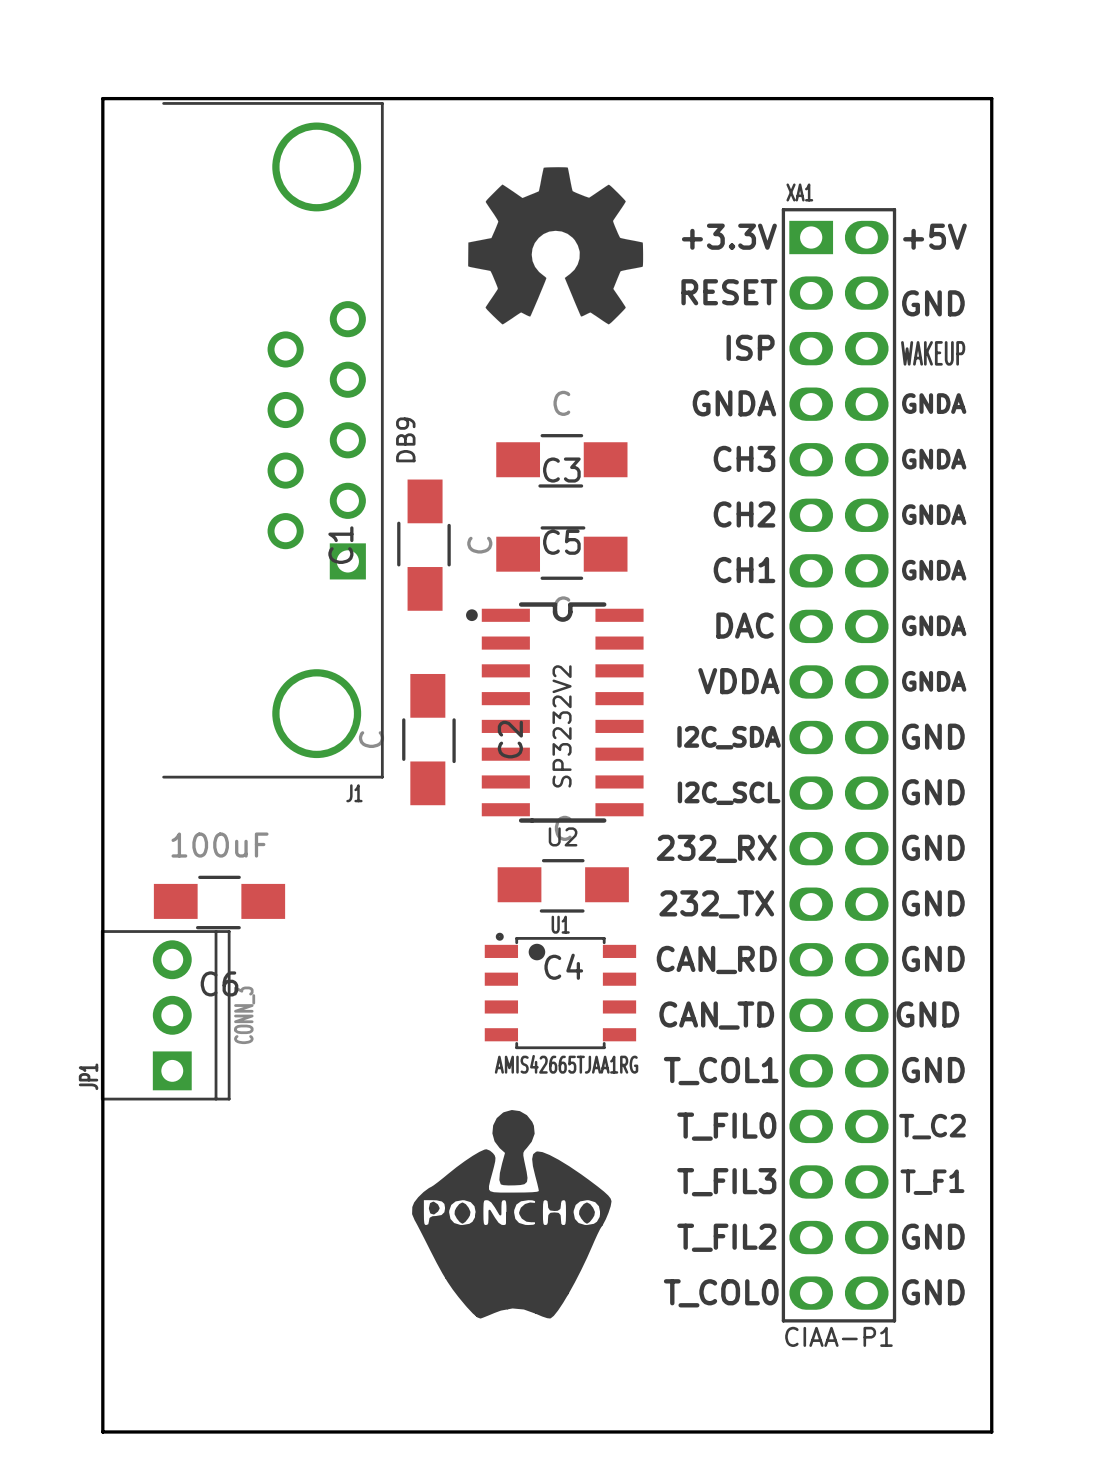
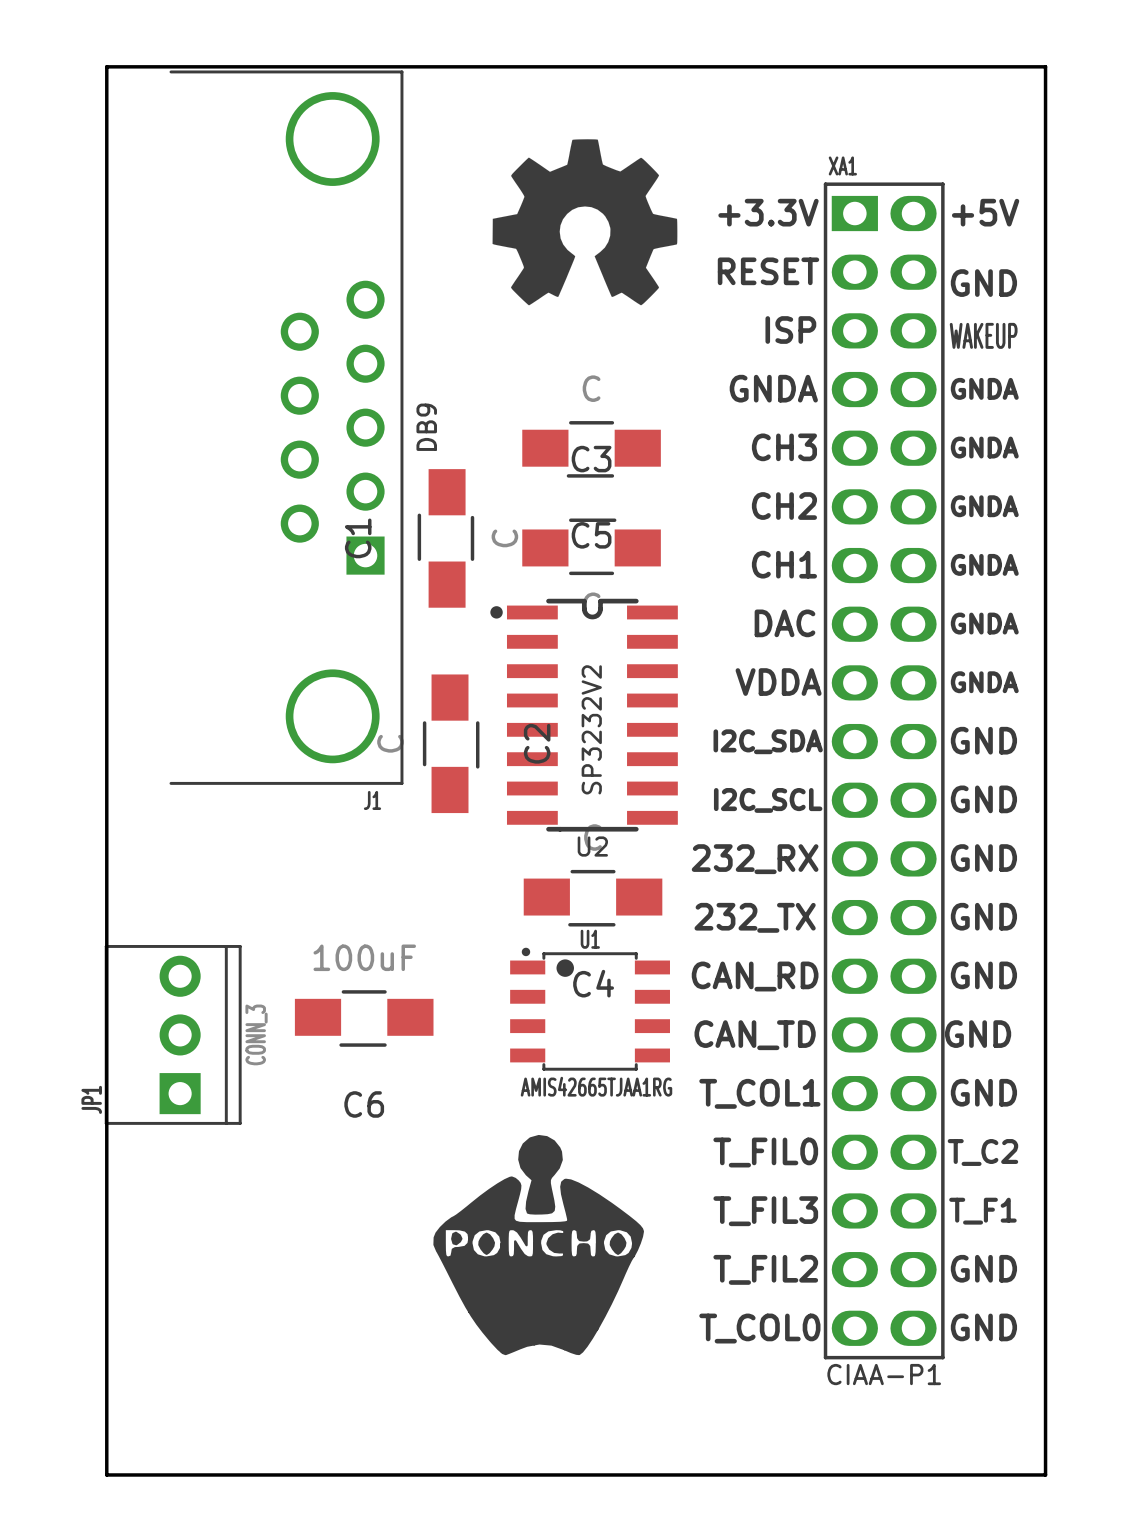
C6 position: (219, 902) -> (364, 1018)

